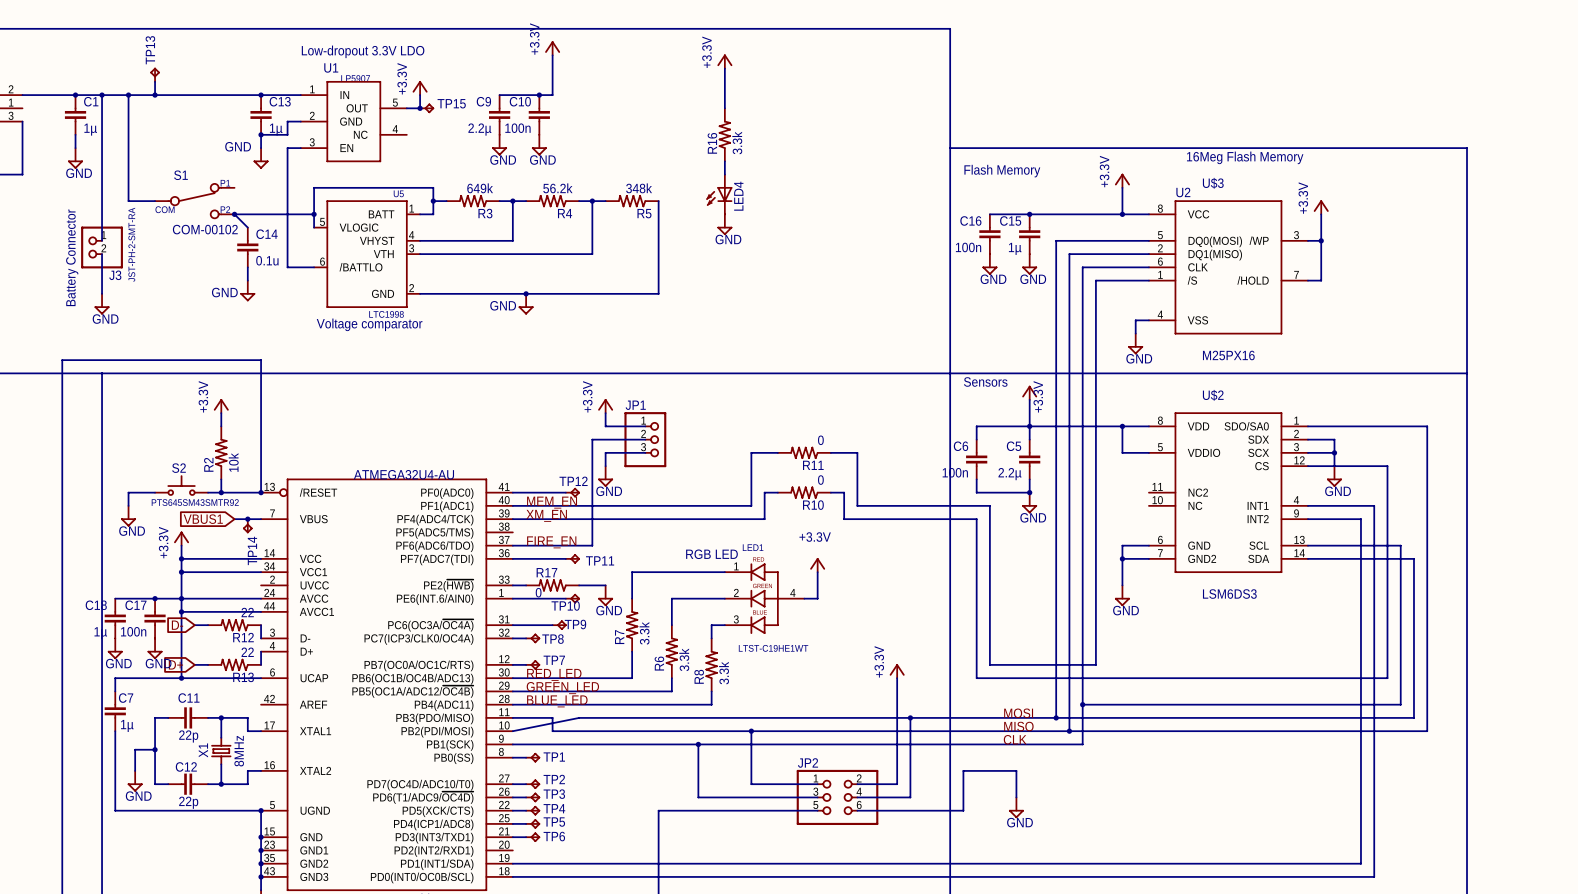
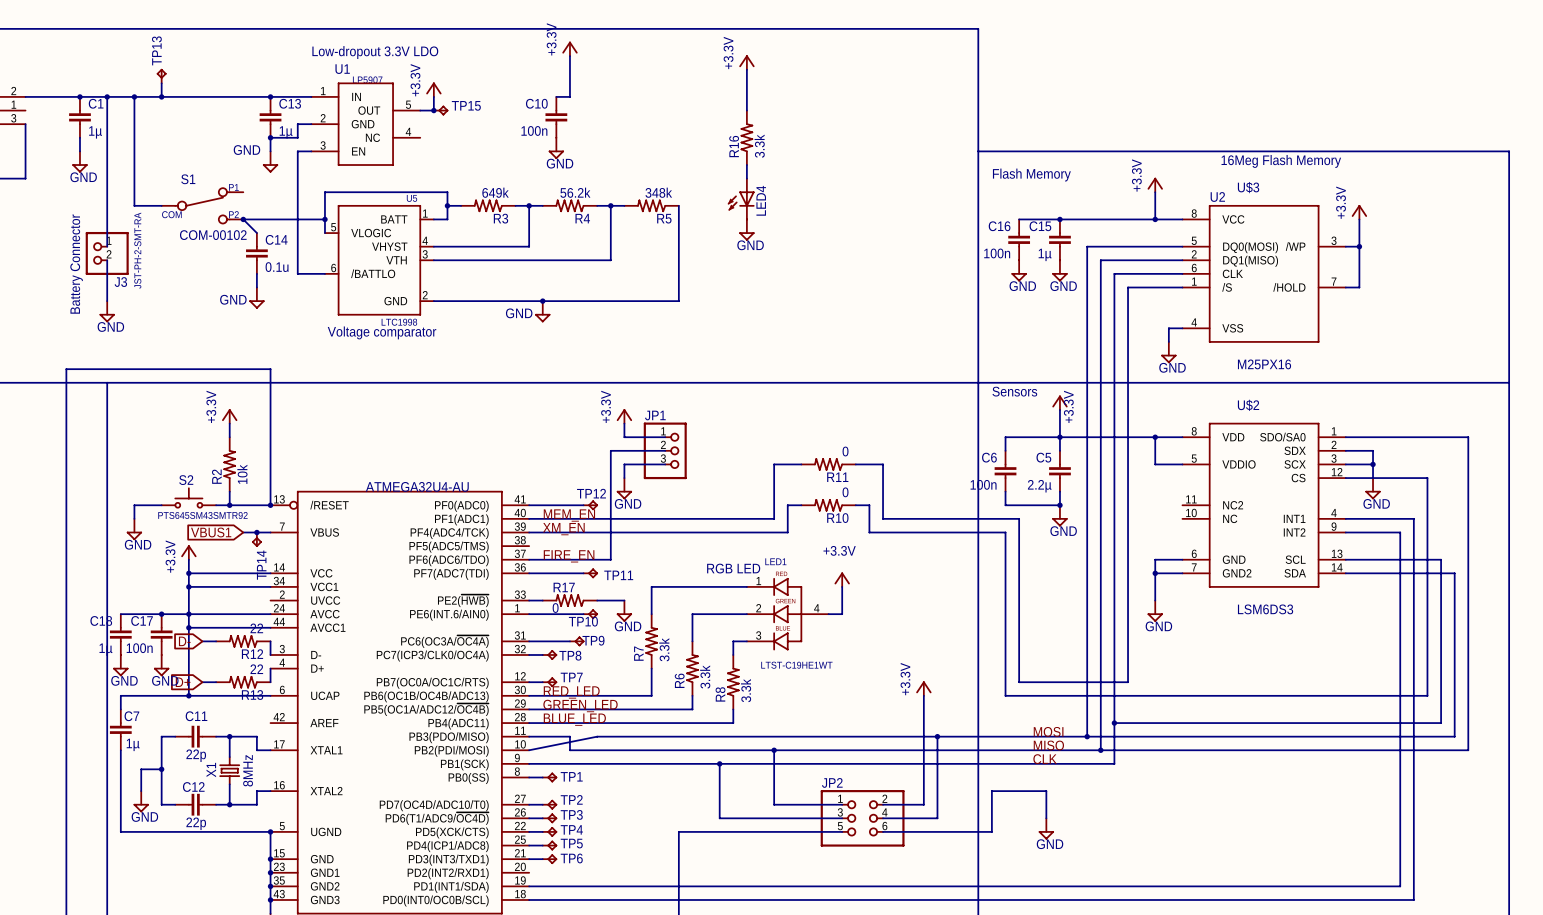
wire: (499, 95) (539, 95) -> none
junction: (539, 95) -> none
C9: 2.2µ (499, 114) -> none
power symbol: GND (499, 145) -> none

